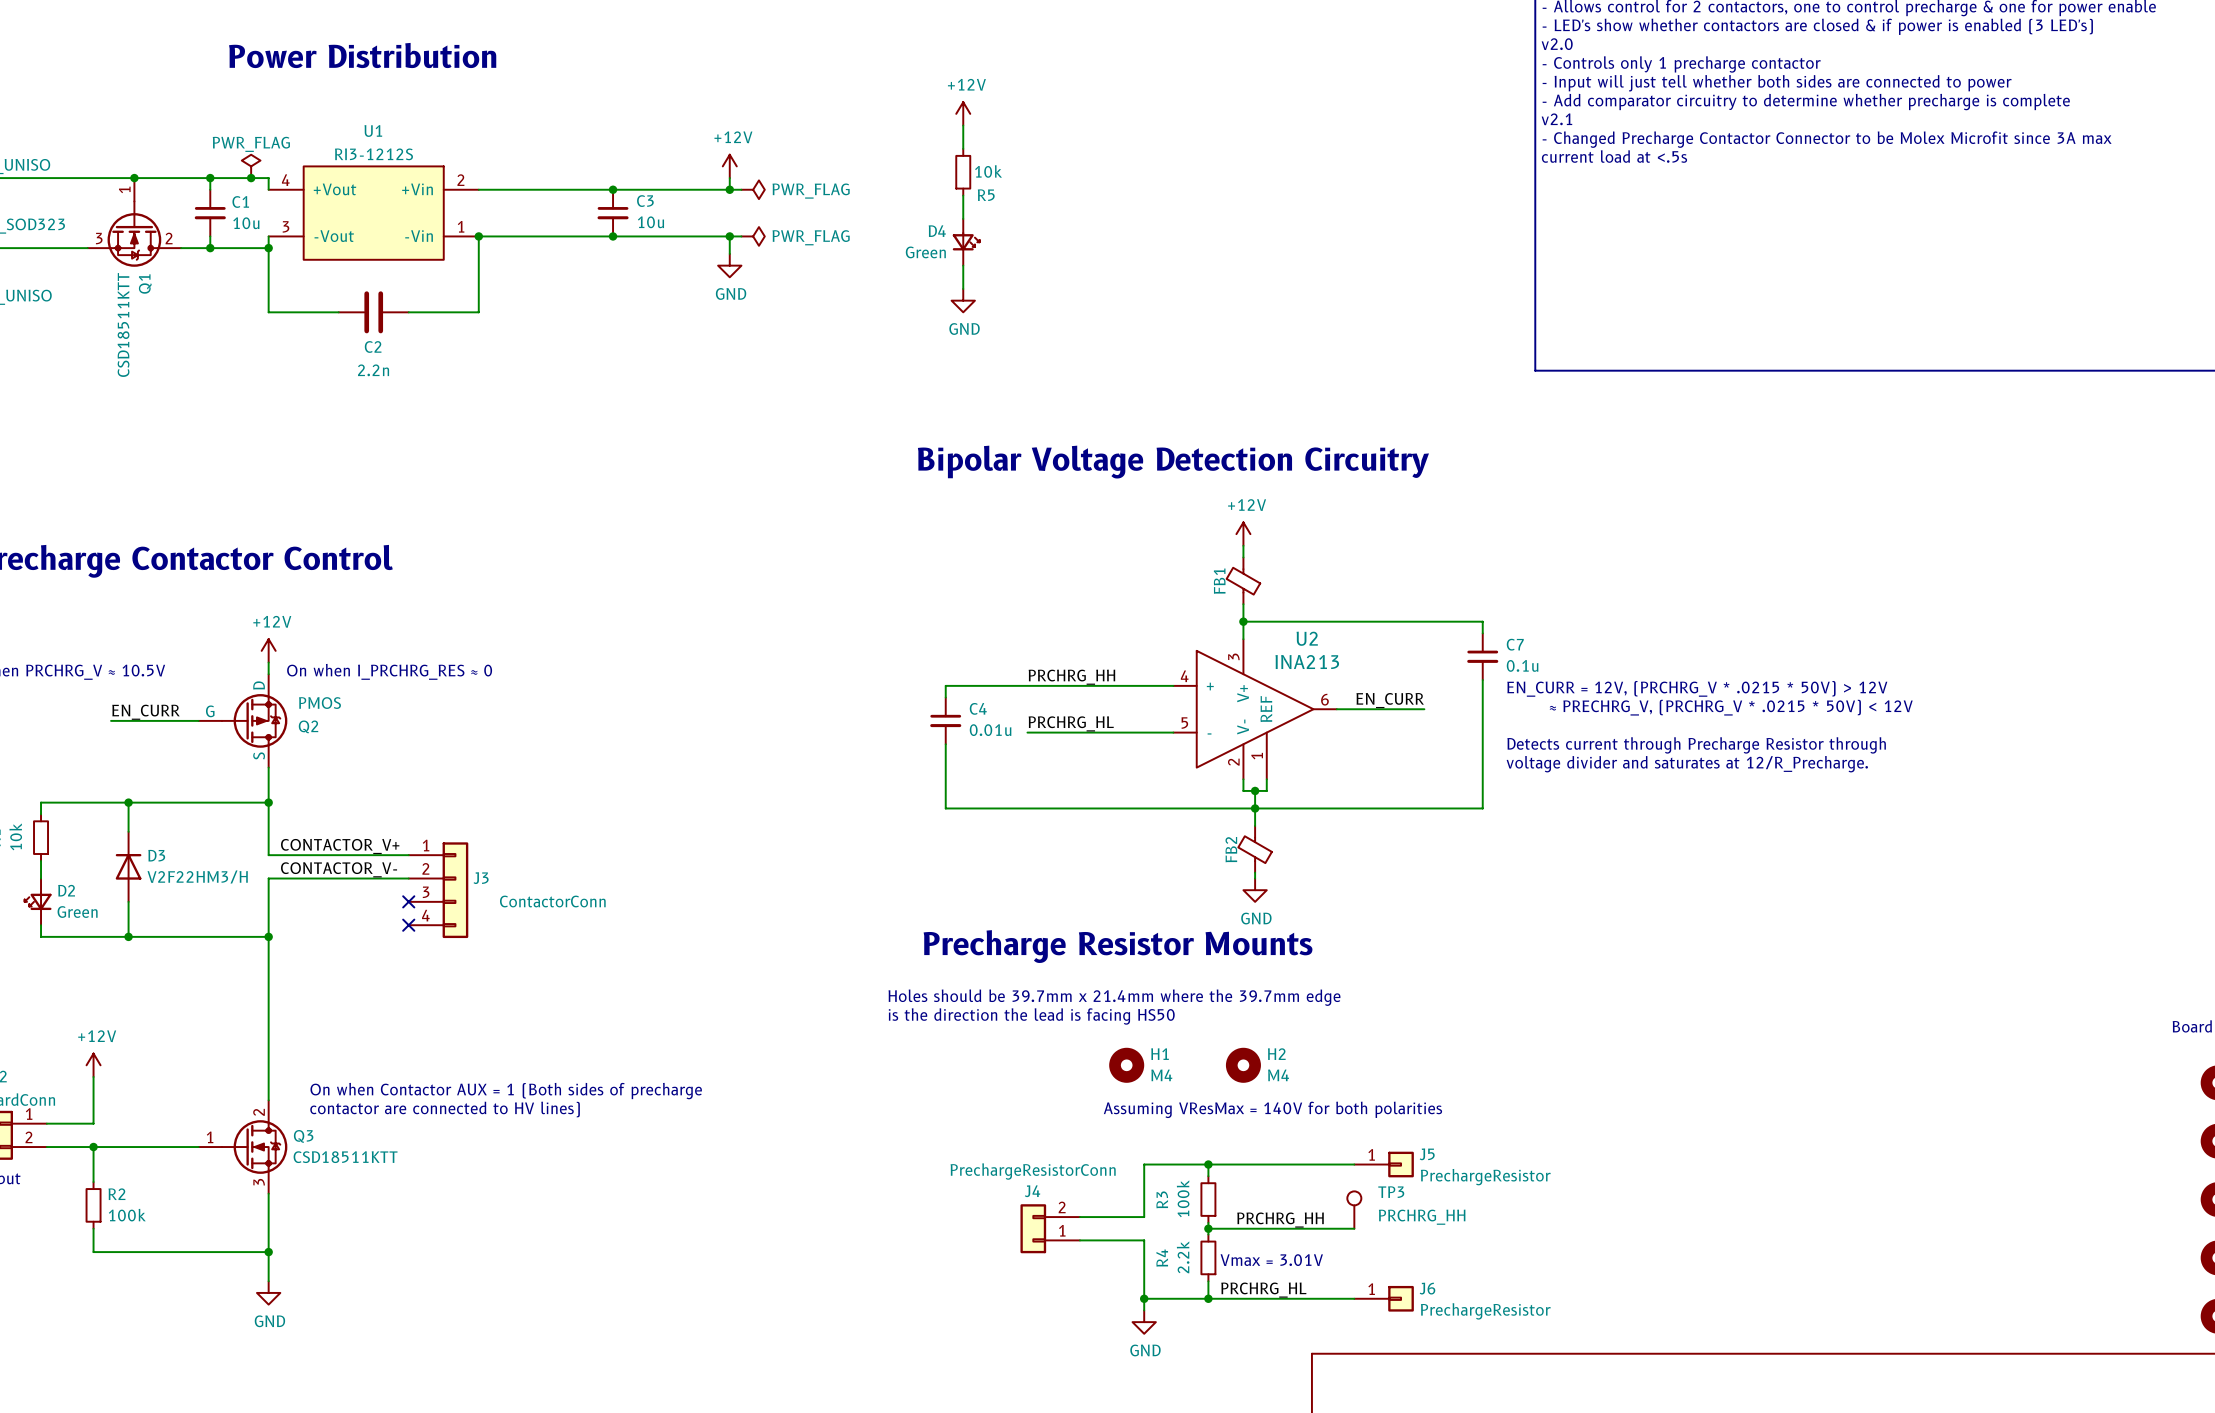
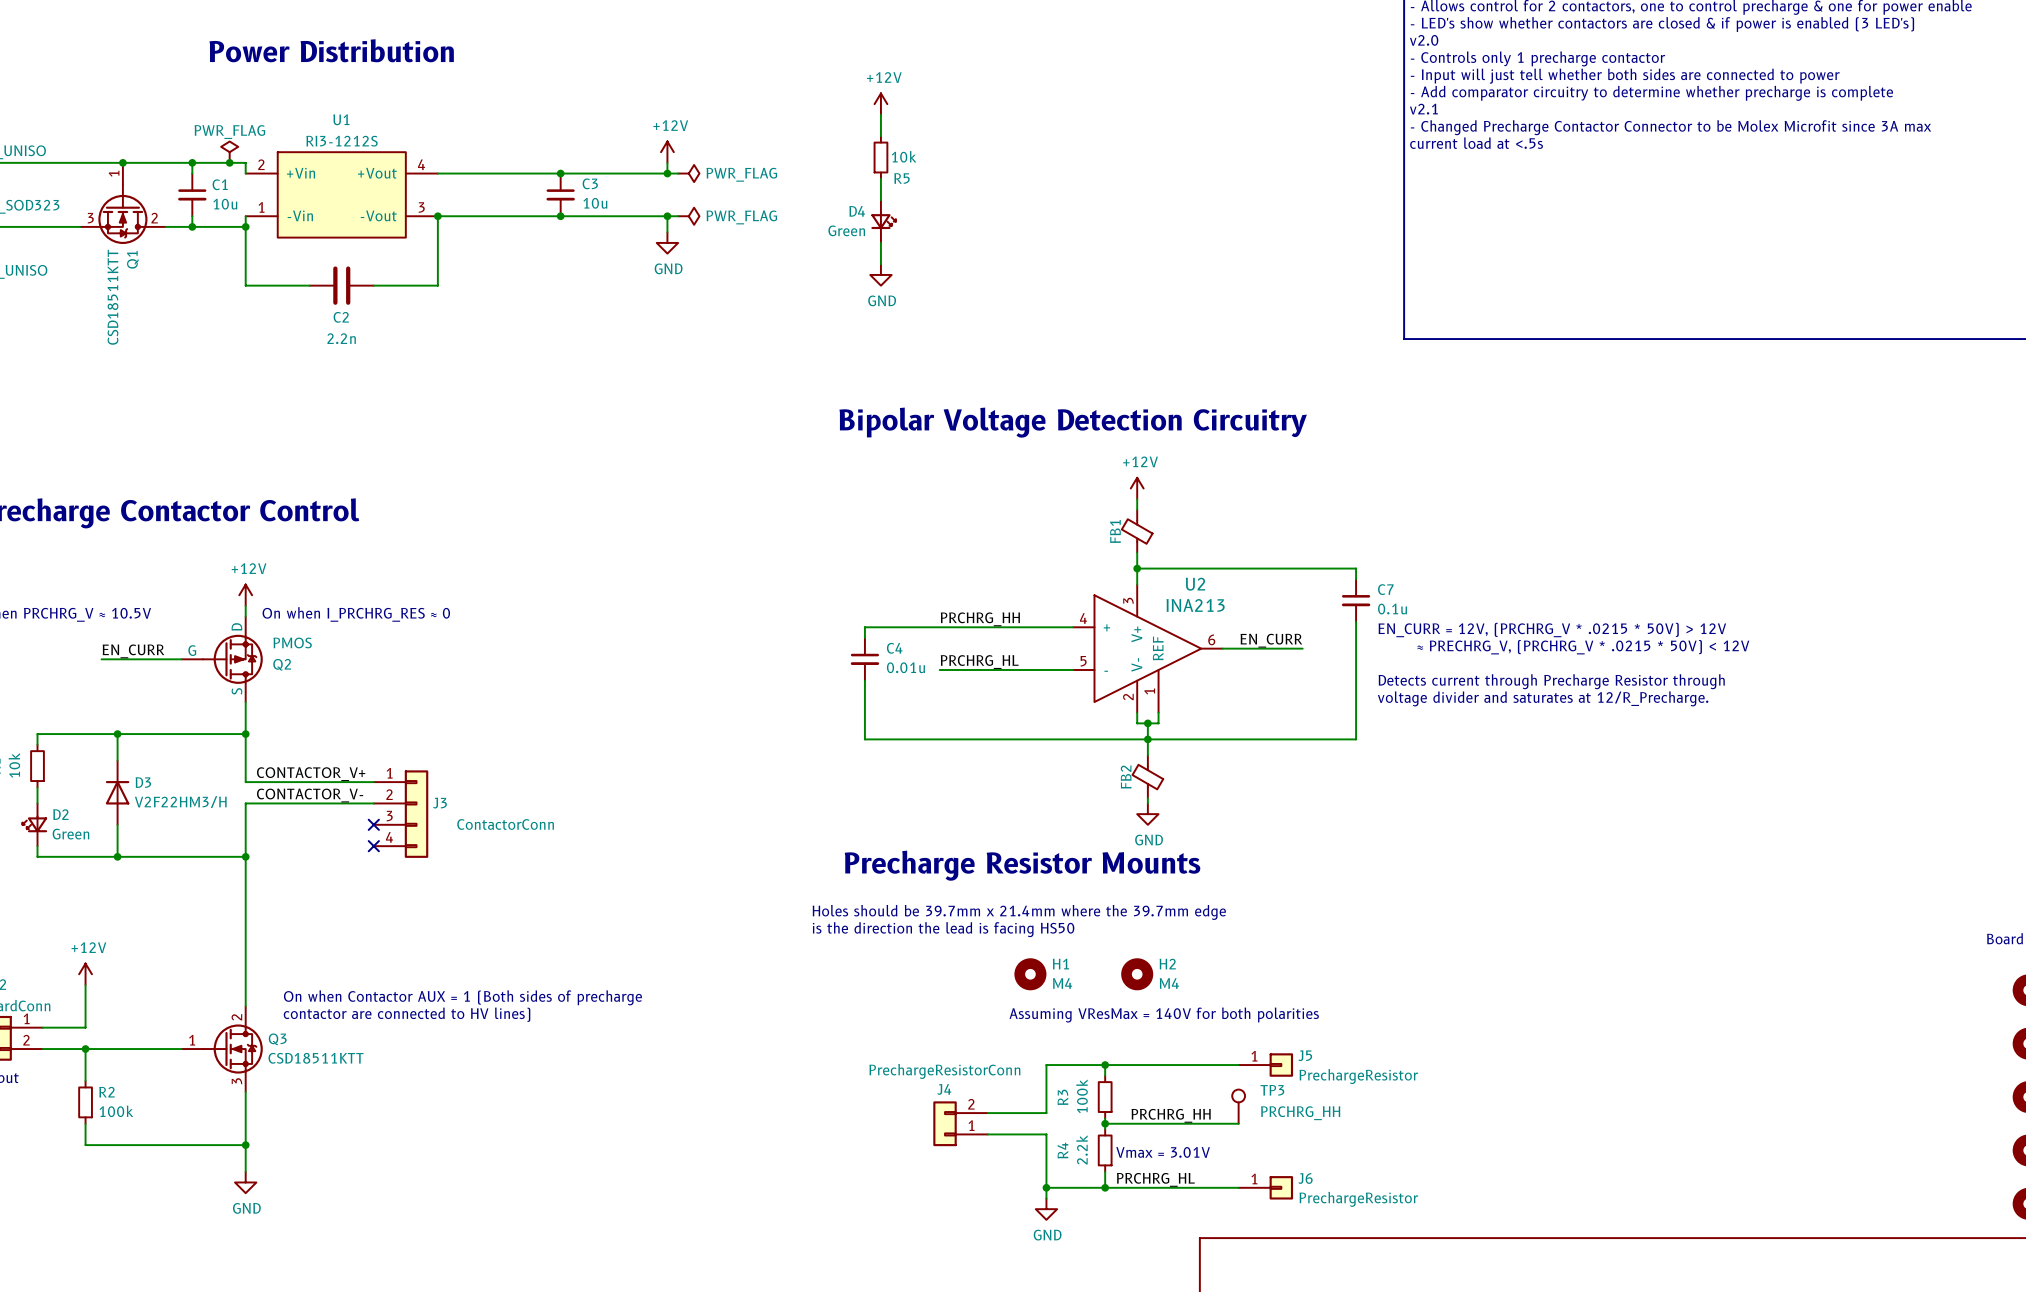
U1 flip: as is (373, 213) -> left-right (341, 194)

